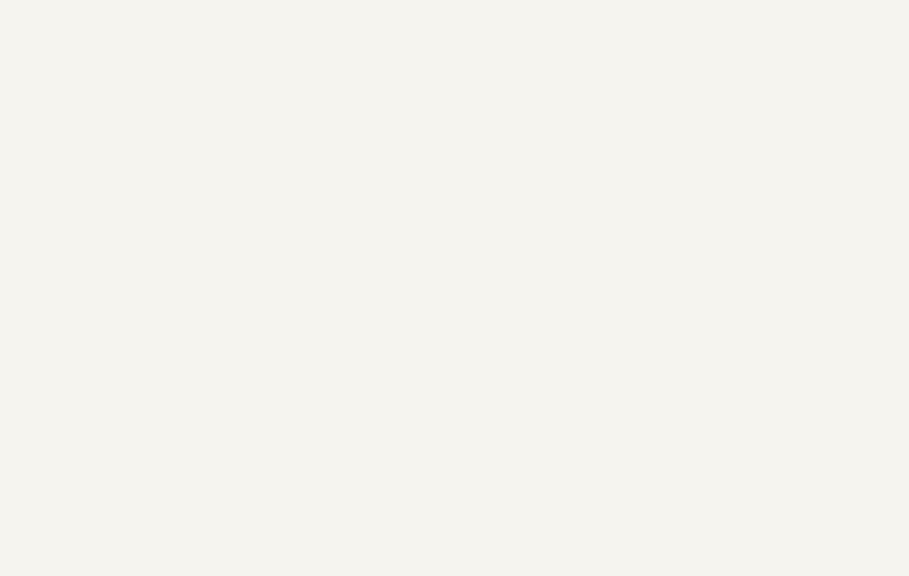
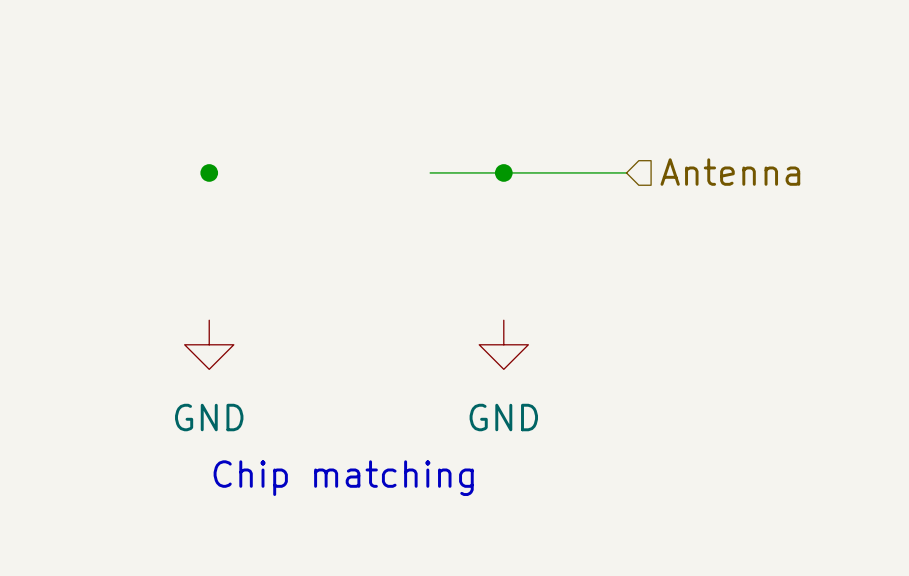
junction: none -> (209, 172)
wire: none -> (430, 172) (626, 172)
junction: none -> (503, 172)
hierarchical label: none -> Antenna (730, 172)
power symbol: none -> GND (209, 344)
power symbol: none -> GND (503, 344)
text: none -> Chip matching (343, 478)

